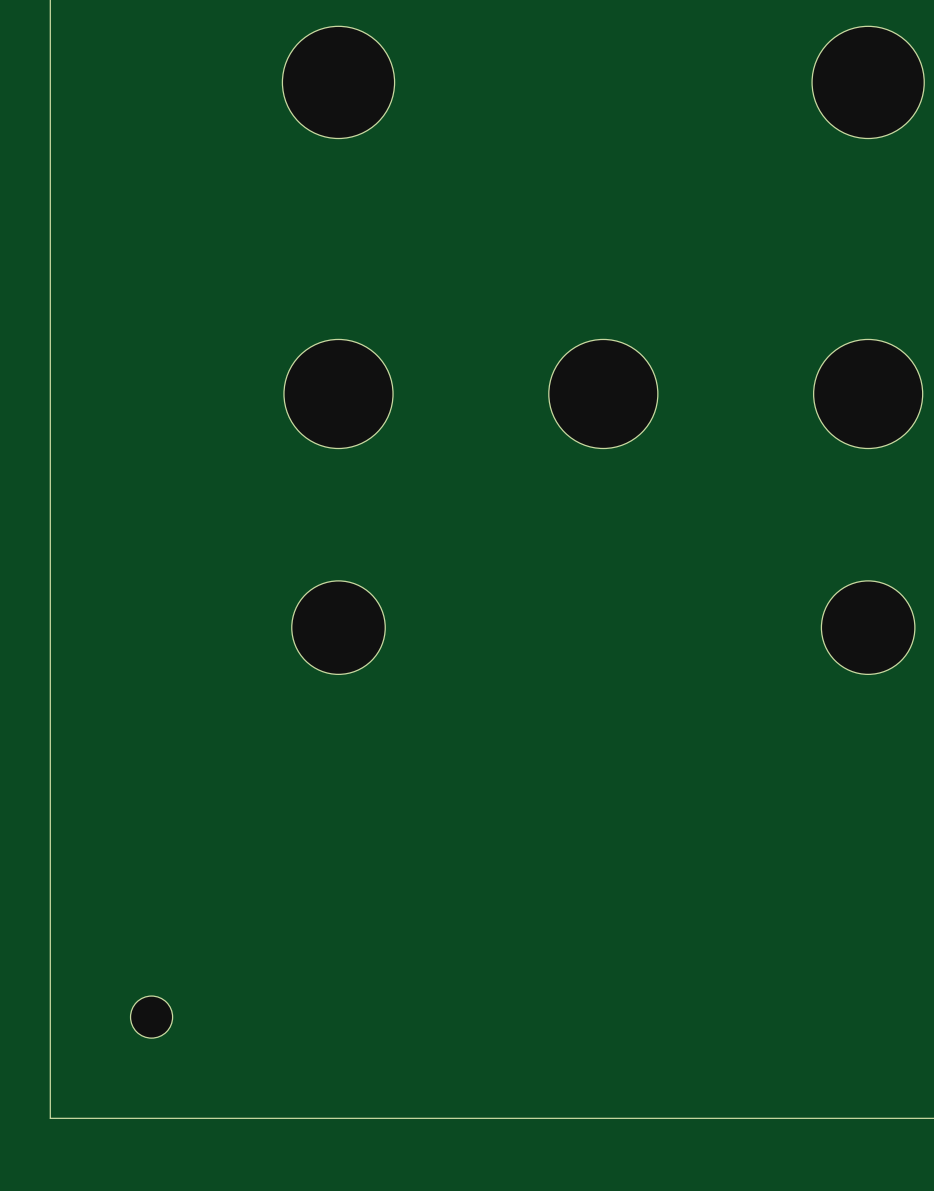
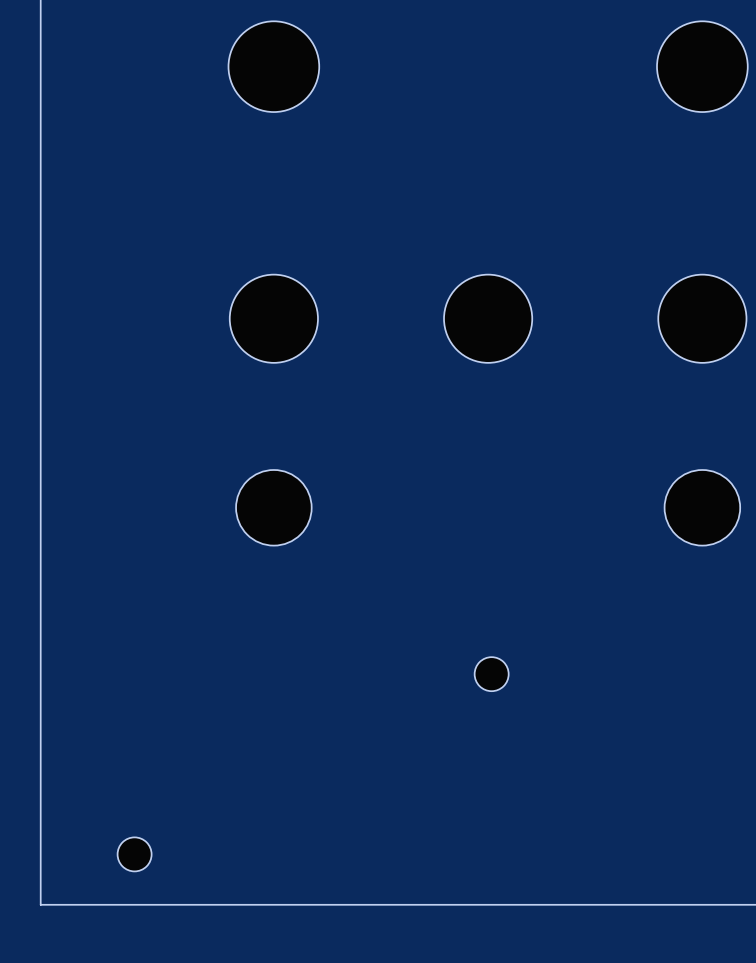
part: none -> (491, 674)
part position: (151, 1017) -> (134, 854)

